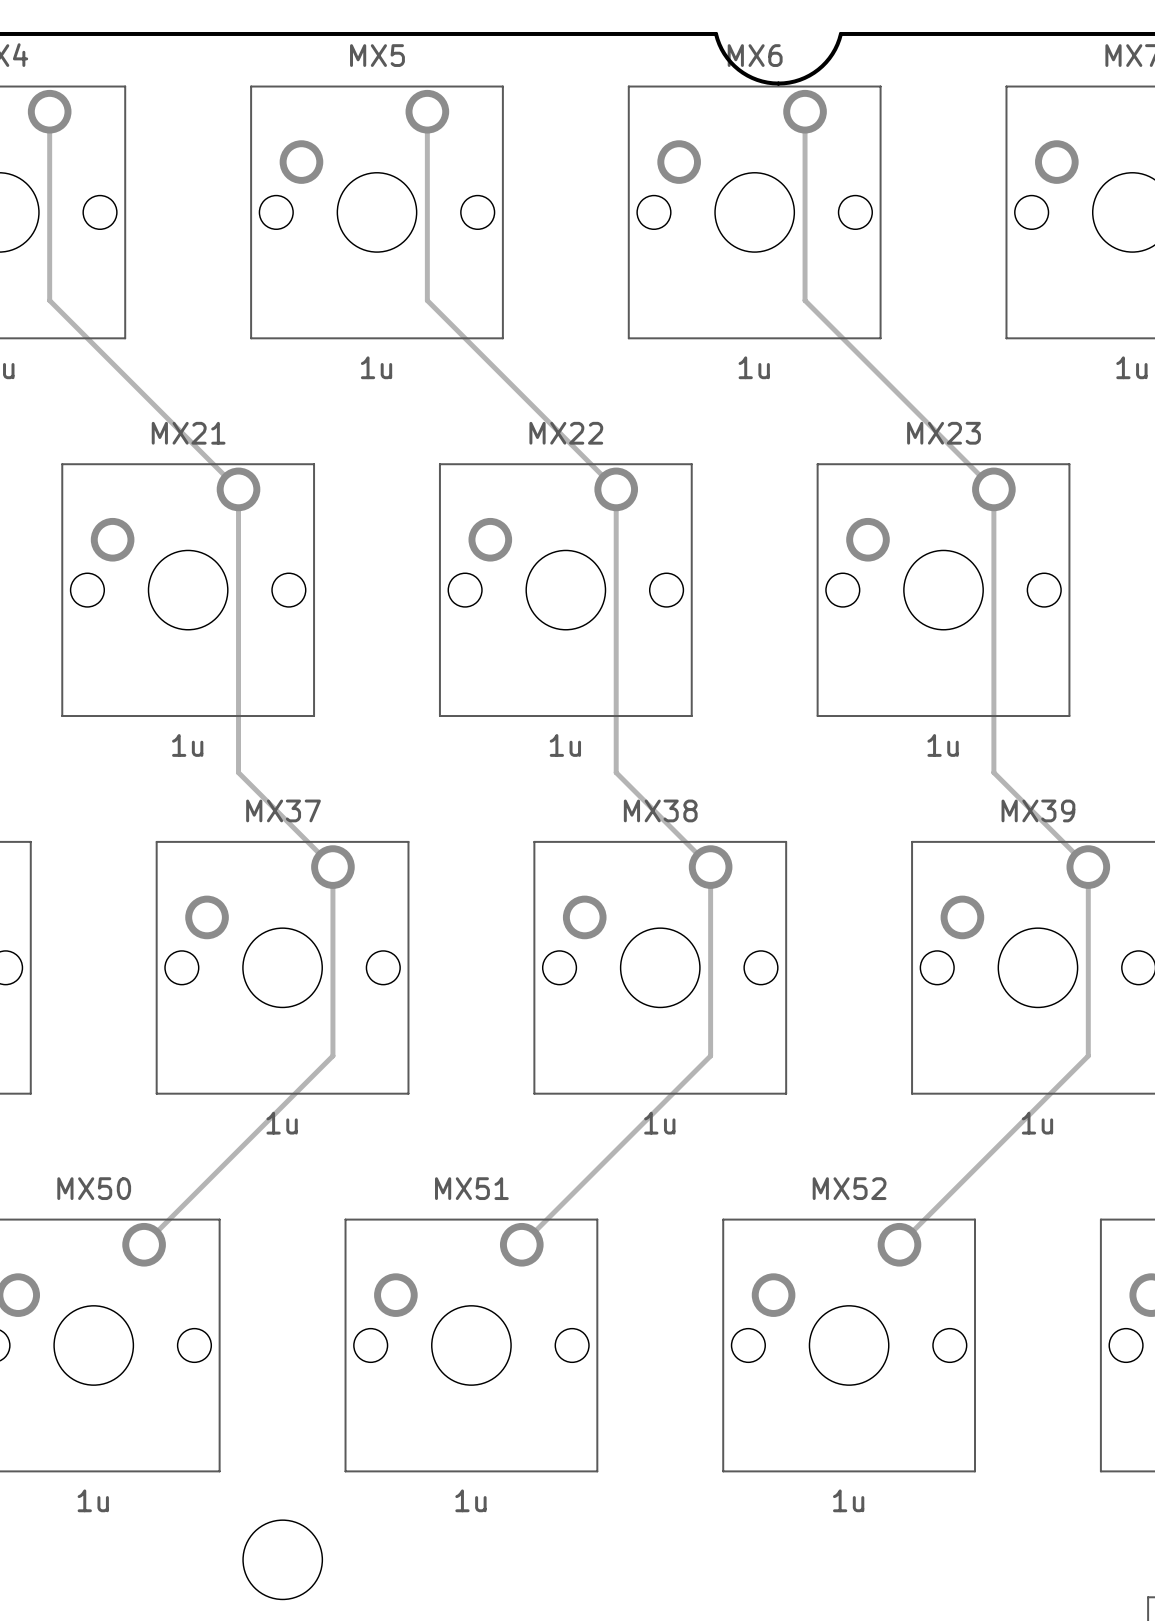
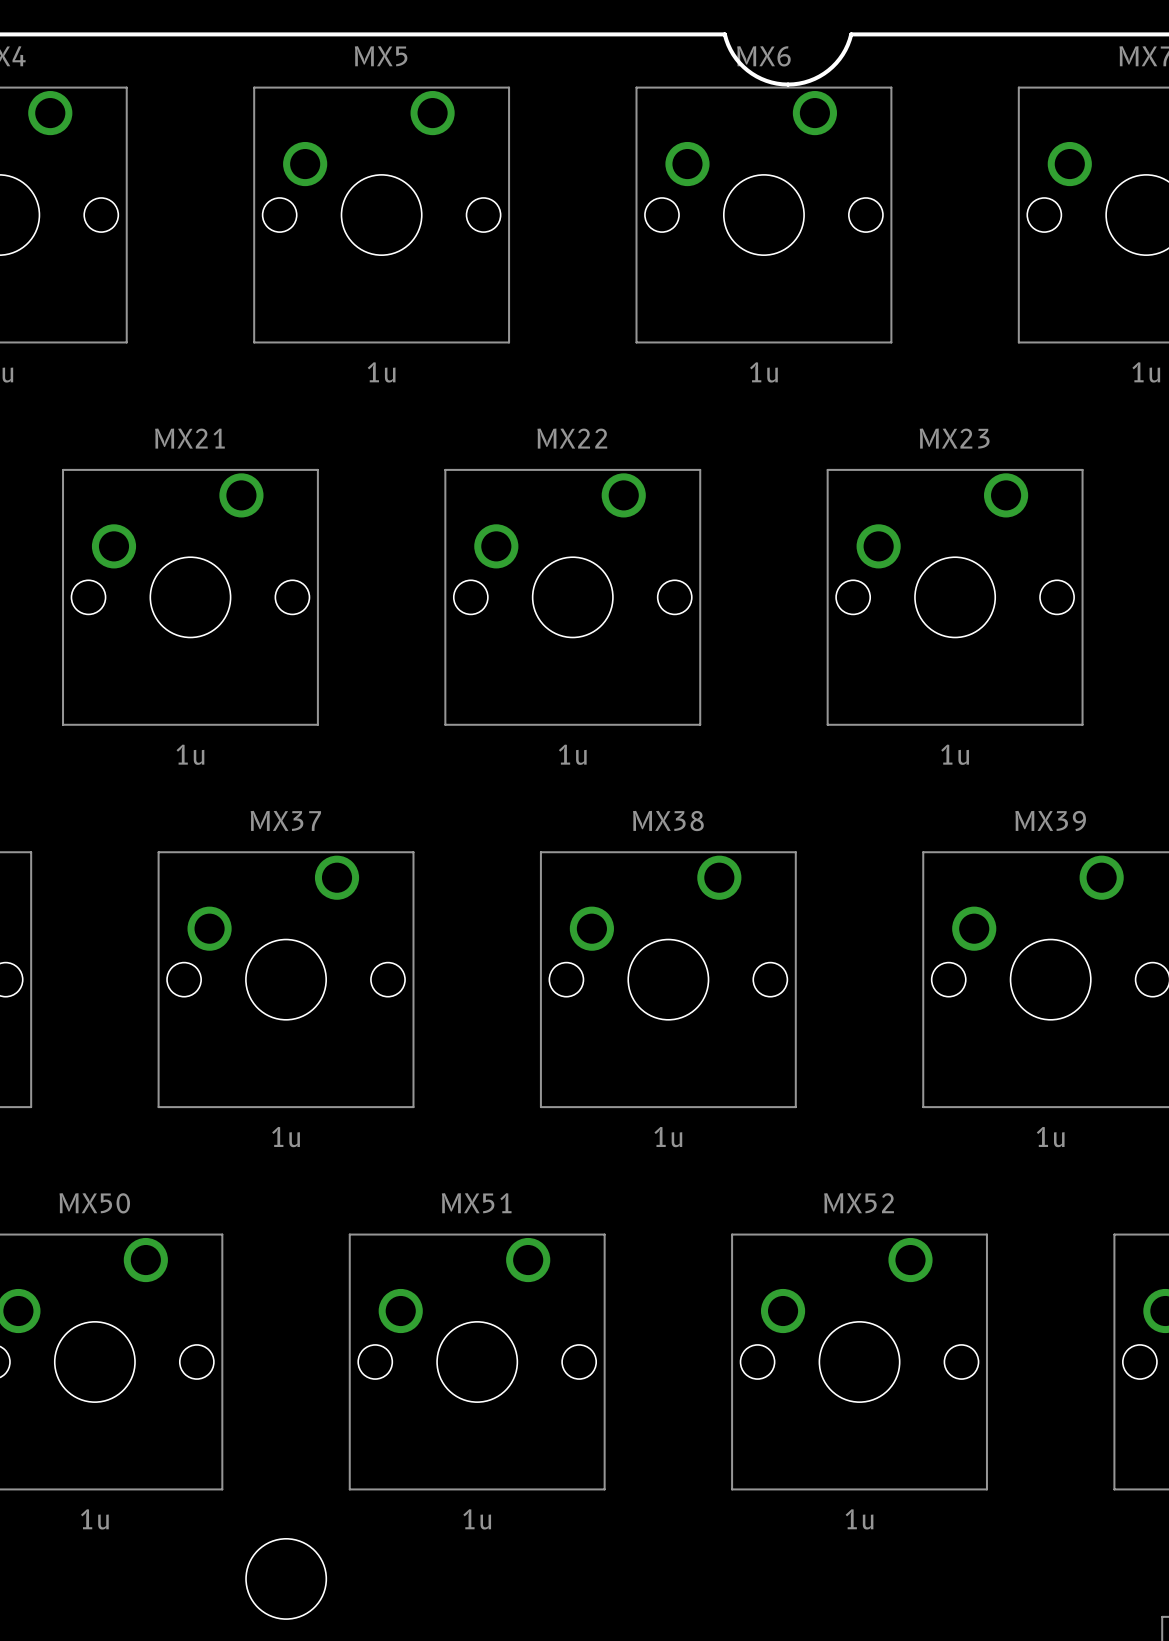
track: (49, 111) (49, 300) (238, 489) (238, 772) (332, 867) (332, 1055) (144, 1244) -> none
track: (427, 111) (427, 300) (616, 489) (616, 772) (710, 867) (710, 1055) (521, 1244) -> none
track: (805, 111) (805, 300) (993, 489) (993, 772) (1088, 867) (1088, 1055) (899, 1244) -> none

